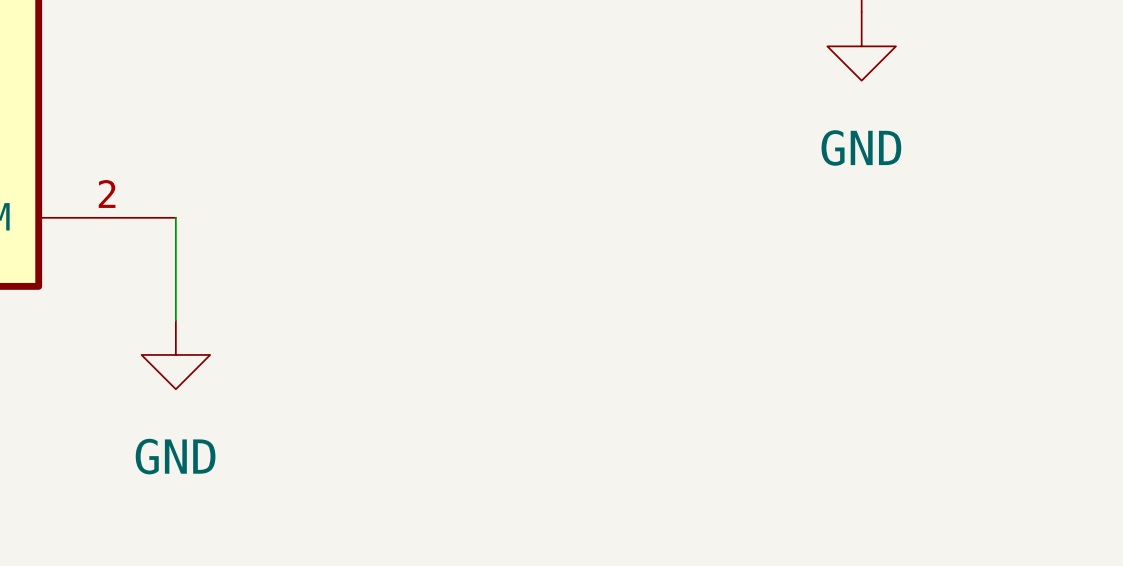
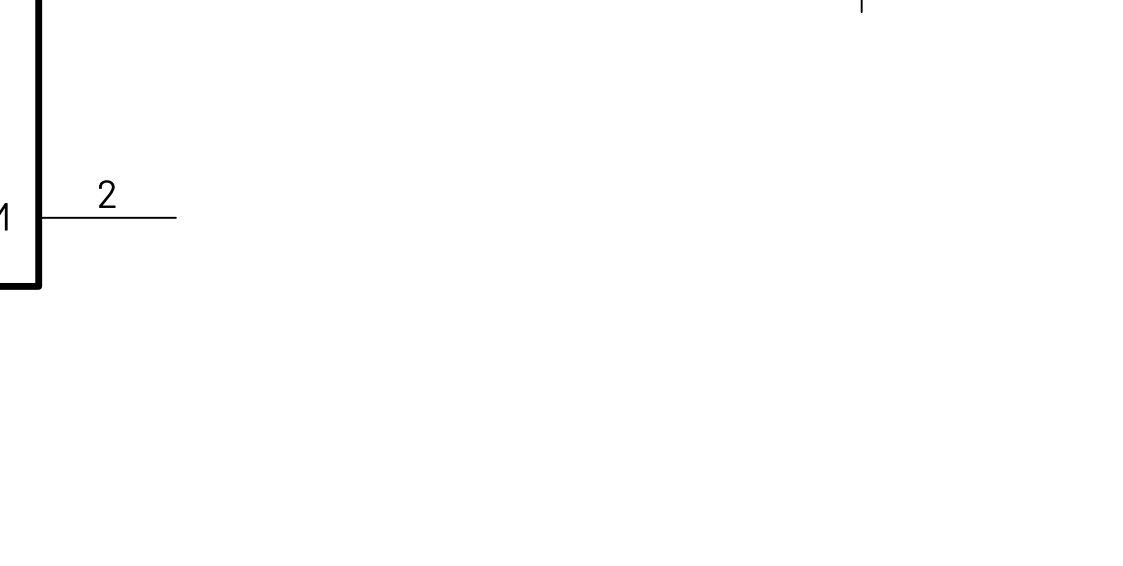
power symbol: GND (861, 46) -> none
wire: (175, 217) (175, 320) -> none
power symbol: GND (175, 354) -> none

